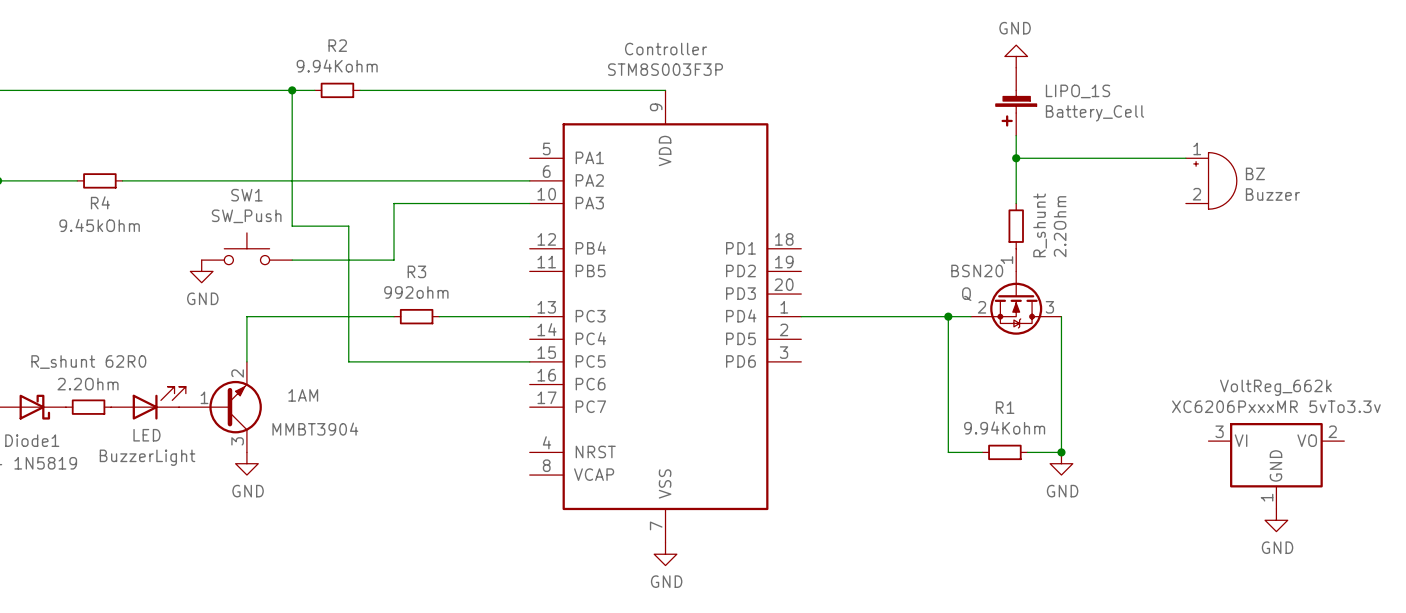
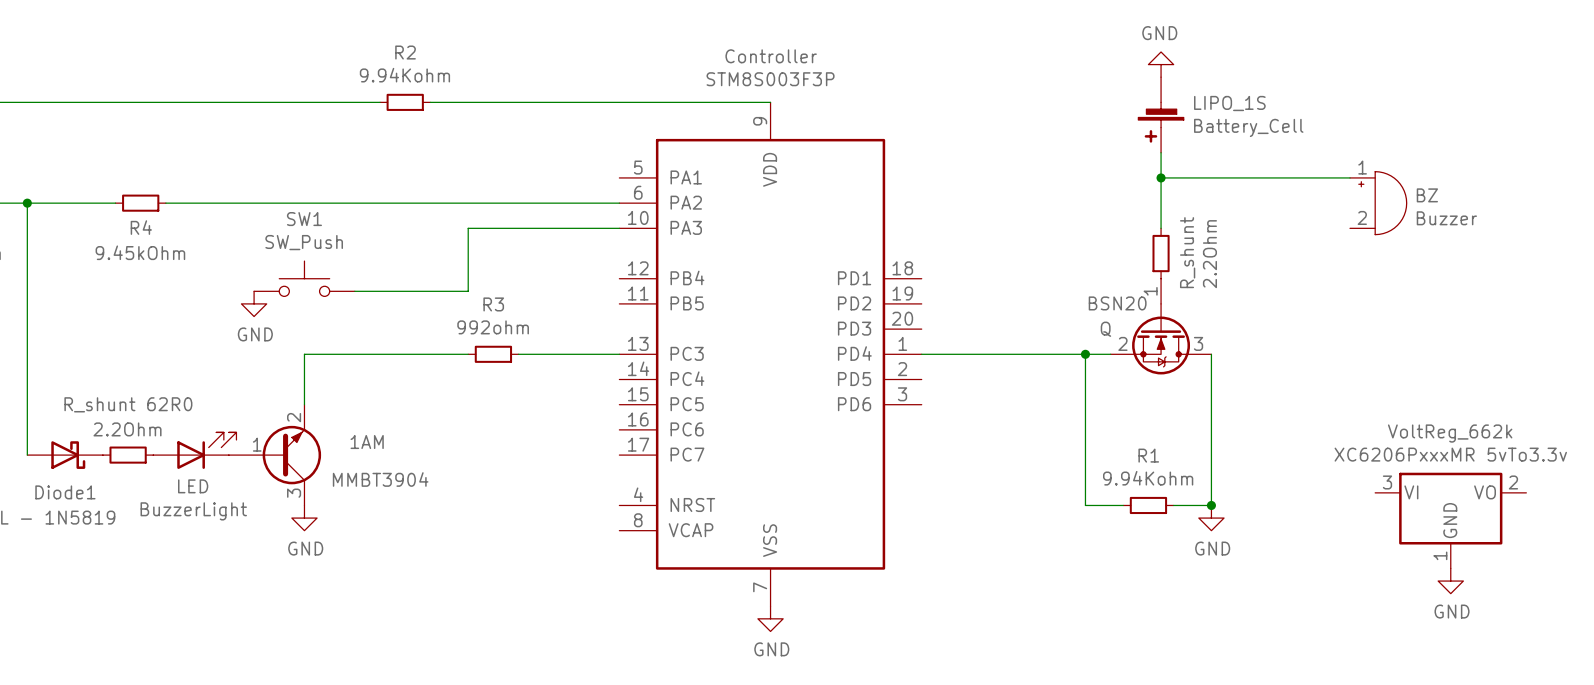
wire: (292, 90) (292, 226) (348, 226) (348, 361) (529, 361) -> none
junction: (292, 90) -> none

